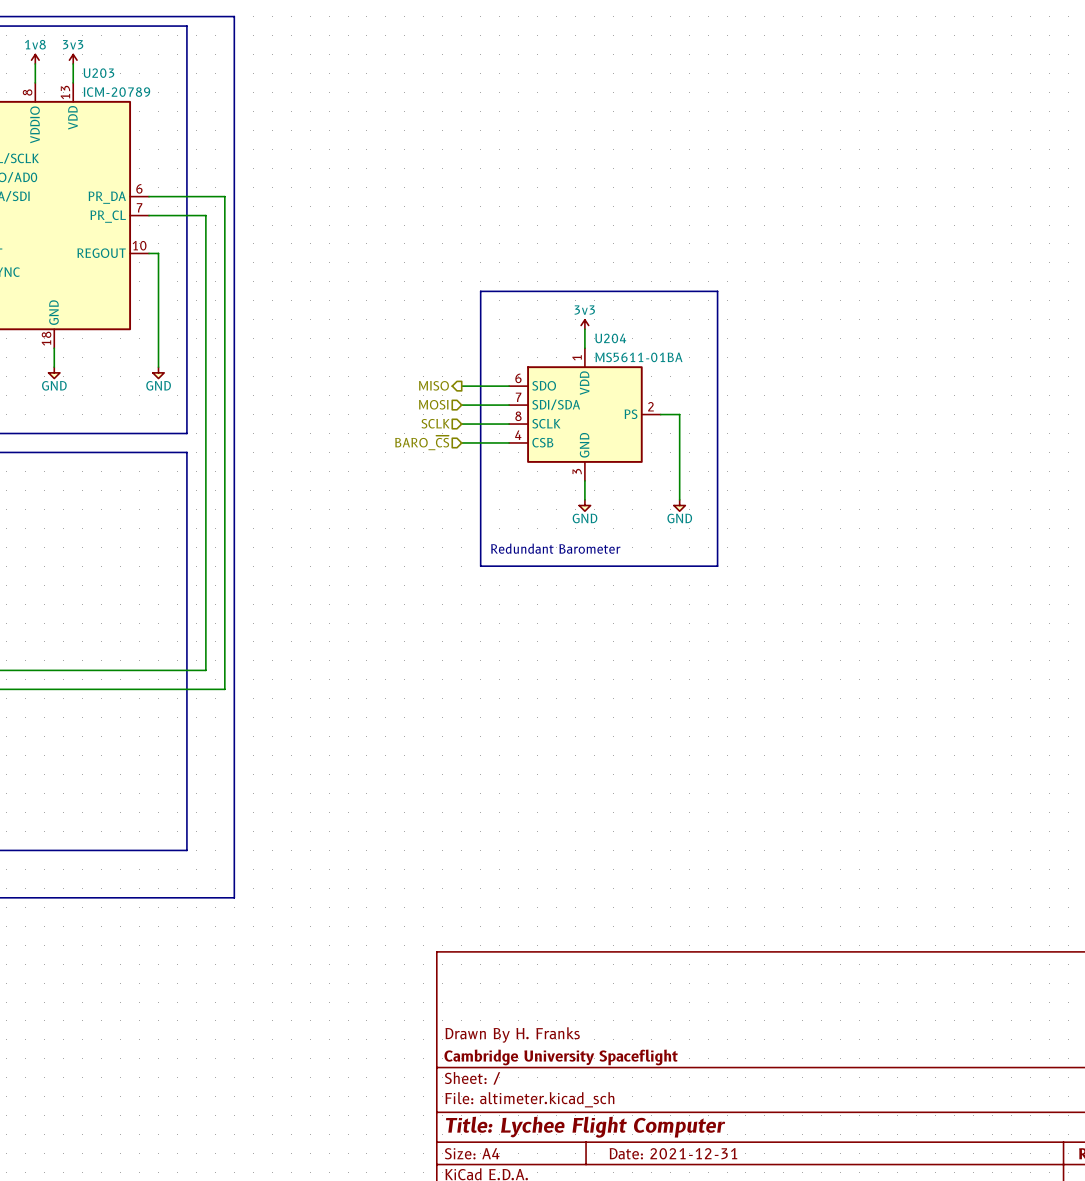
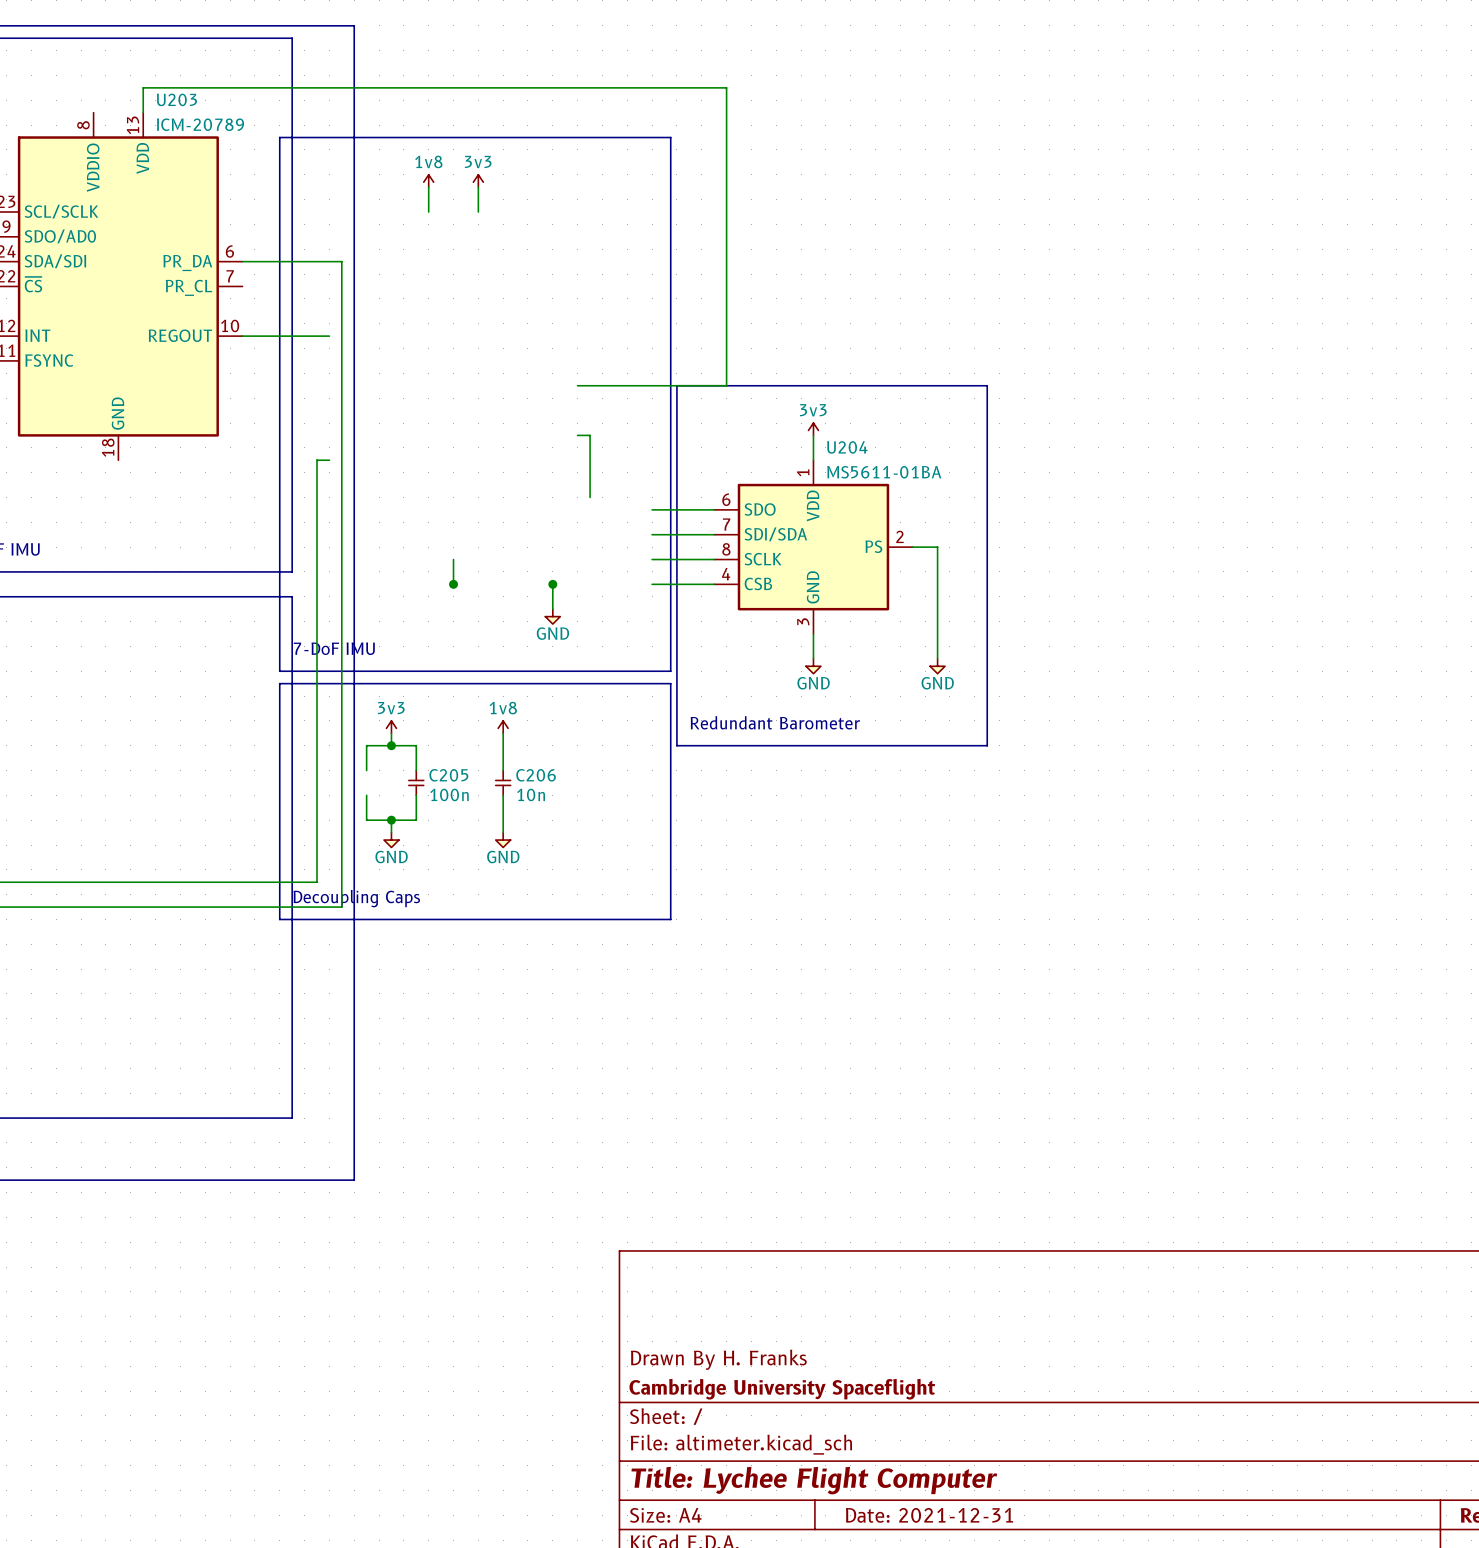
power symbol: 1v8 (35, 59) -> none
power symbol: 3v3 (73, 59) -> none
wire: (35, 63) (35, 82) -> none
wire: none -> (143, 87) (726, 87) (726, 385) (577, 385)
line: none -> (279, 137) (670, 137) (670, 671) (279, 671) (279, 137)
power symbol: none -> 1v8 (428, 180)
power symbol: none -> 3v3 (478, 180)
wire: none -> (428, 187) (428, 211)
wire: none -> (478, 187) (478, 211)
wire: (149, 215) (205, 215) (205, 348) -> (329, 460) (316, 460)
wire: (158, 253) (158, 367) -> (254, 336) (329, 336)
wire: none -> (577, 435) (590, 435) (590, 497)
wire: (54, 348) (54, 367) -> none
power symbol: GND (54, 372) -> none
power symbol: GND (158, 372) -> none
hierarchical label: MISO (433, 385) -> none
hierarchical label: MOSI (433, 404) -> none
hierarchical label: SCLK (435, 423) -> none
wire: none -> (453, 559) (453, 584)
junction: none -> (453, 584)
wire: none -> (552, 584) (552, 609)
junction: none -> (552, 584)
hierarchical label: BARO_~{CS} (422, 442) -> none
power symbol: none -> GND (552, 616)
text: none -> 7-DoF IMU (334, 648)
line: none -> (279, 683) (279, 919) (670, 919) (670, 683) (279, 683)
power symbol: none -> 3v3 (391, 727)
power symbol: none -> 1v8 (503, 727)
wire: none -> (391, 733) (391, 745)
wire: none -> (503, 733) (503, 770)
junction: none -> (391, 745)
wire: none -> (366, 770) (366, 745) (416, 745) (416, 770)
C205: none -> 100n (416, 782)
C206: none -> 10n (503, 782)
wire: none -> (366, 795) (366, 820) (416, 820) (416, 795)
wire: none -> (503, 795) (503, 832)
wire: none -> (391, 820) (391, 832)
junction: none -> (391, 820)
power symbol: none -> GND (391, 840)
power symbol: none -> GND (503, 840)
text: none -> Decoupling Caps (356, 898)

